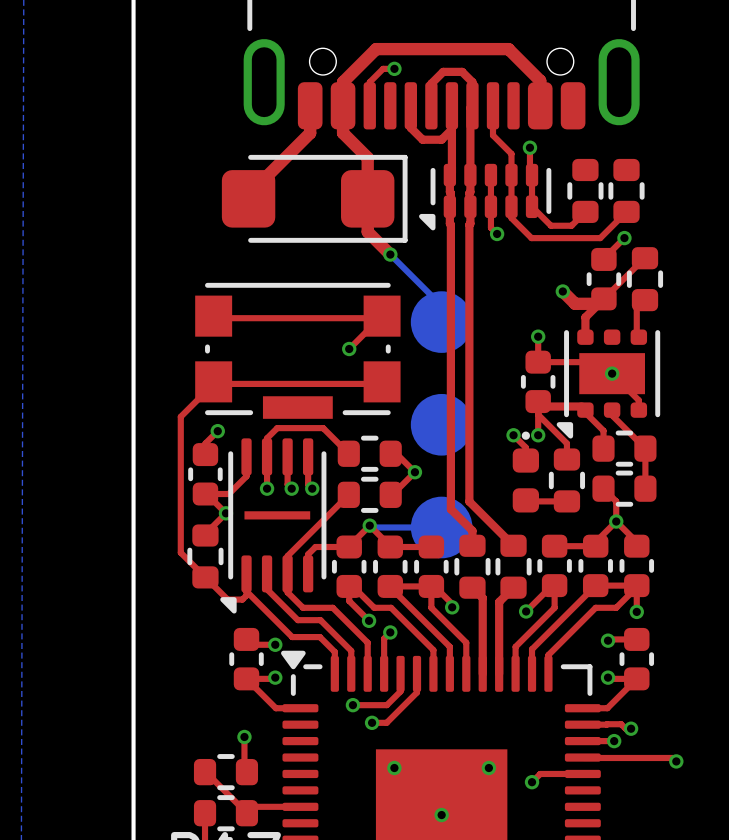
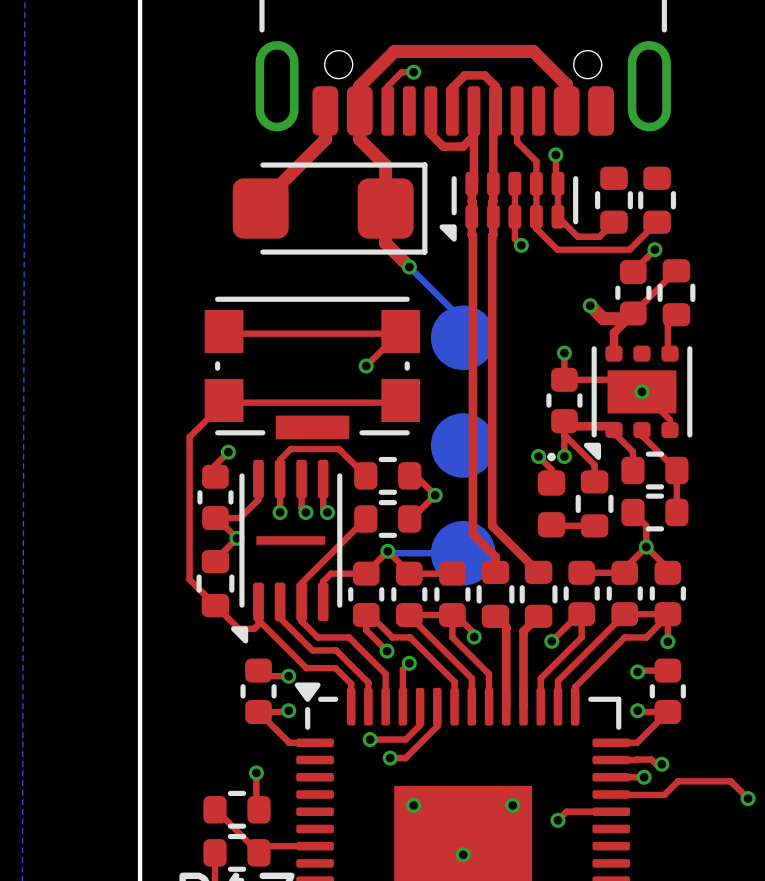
top track: (633, 757) (672, 757) (676, 761) -> (664, 794) (678, 781) (730, 781) (748, 798)
via position: (676, 761) -> (748, 798)

